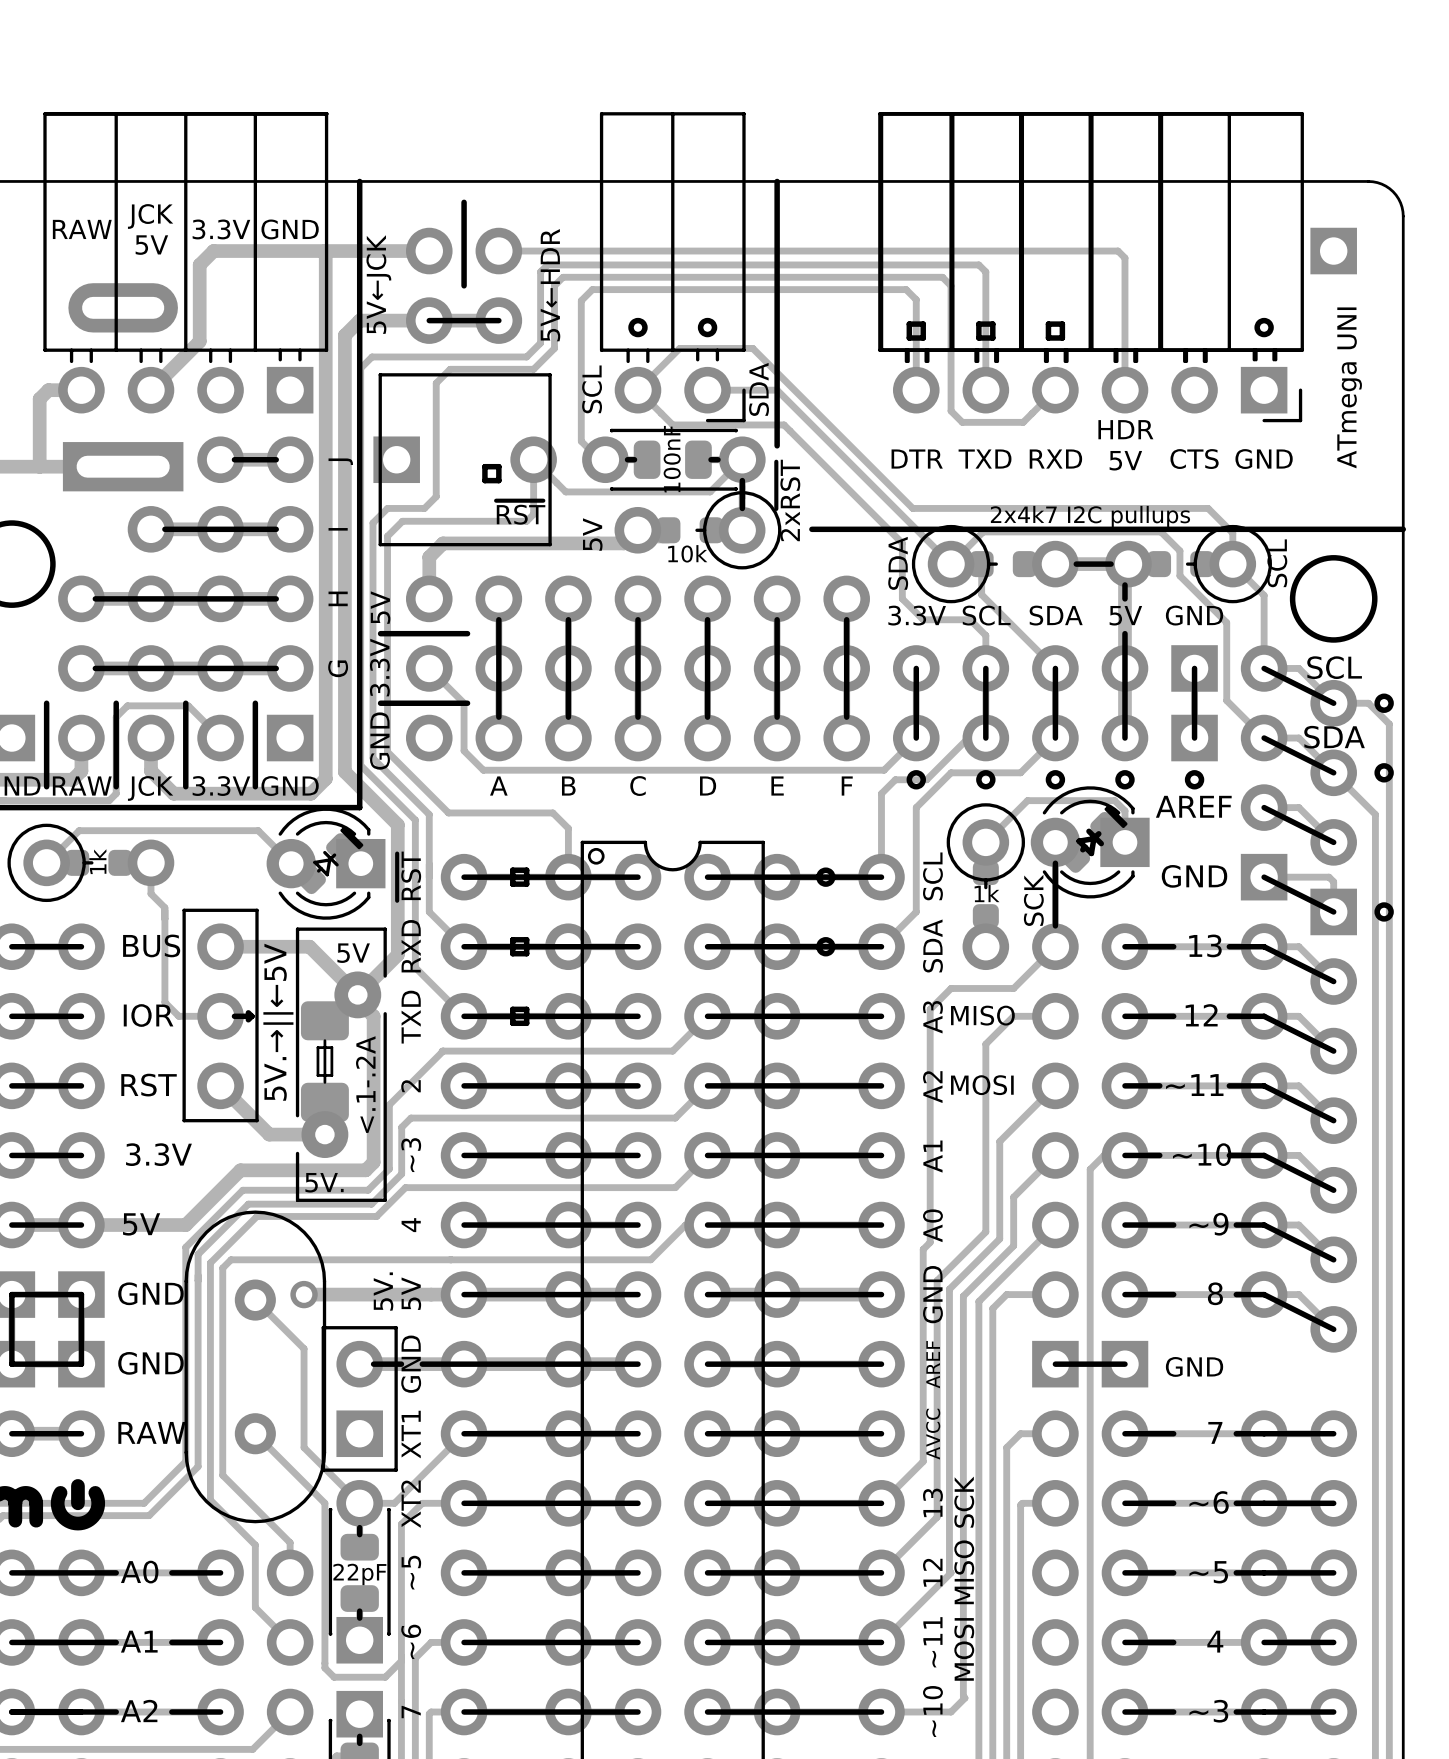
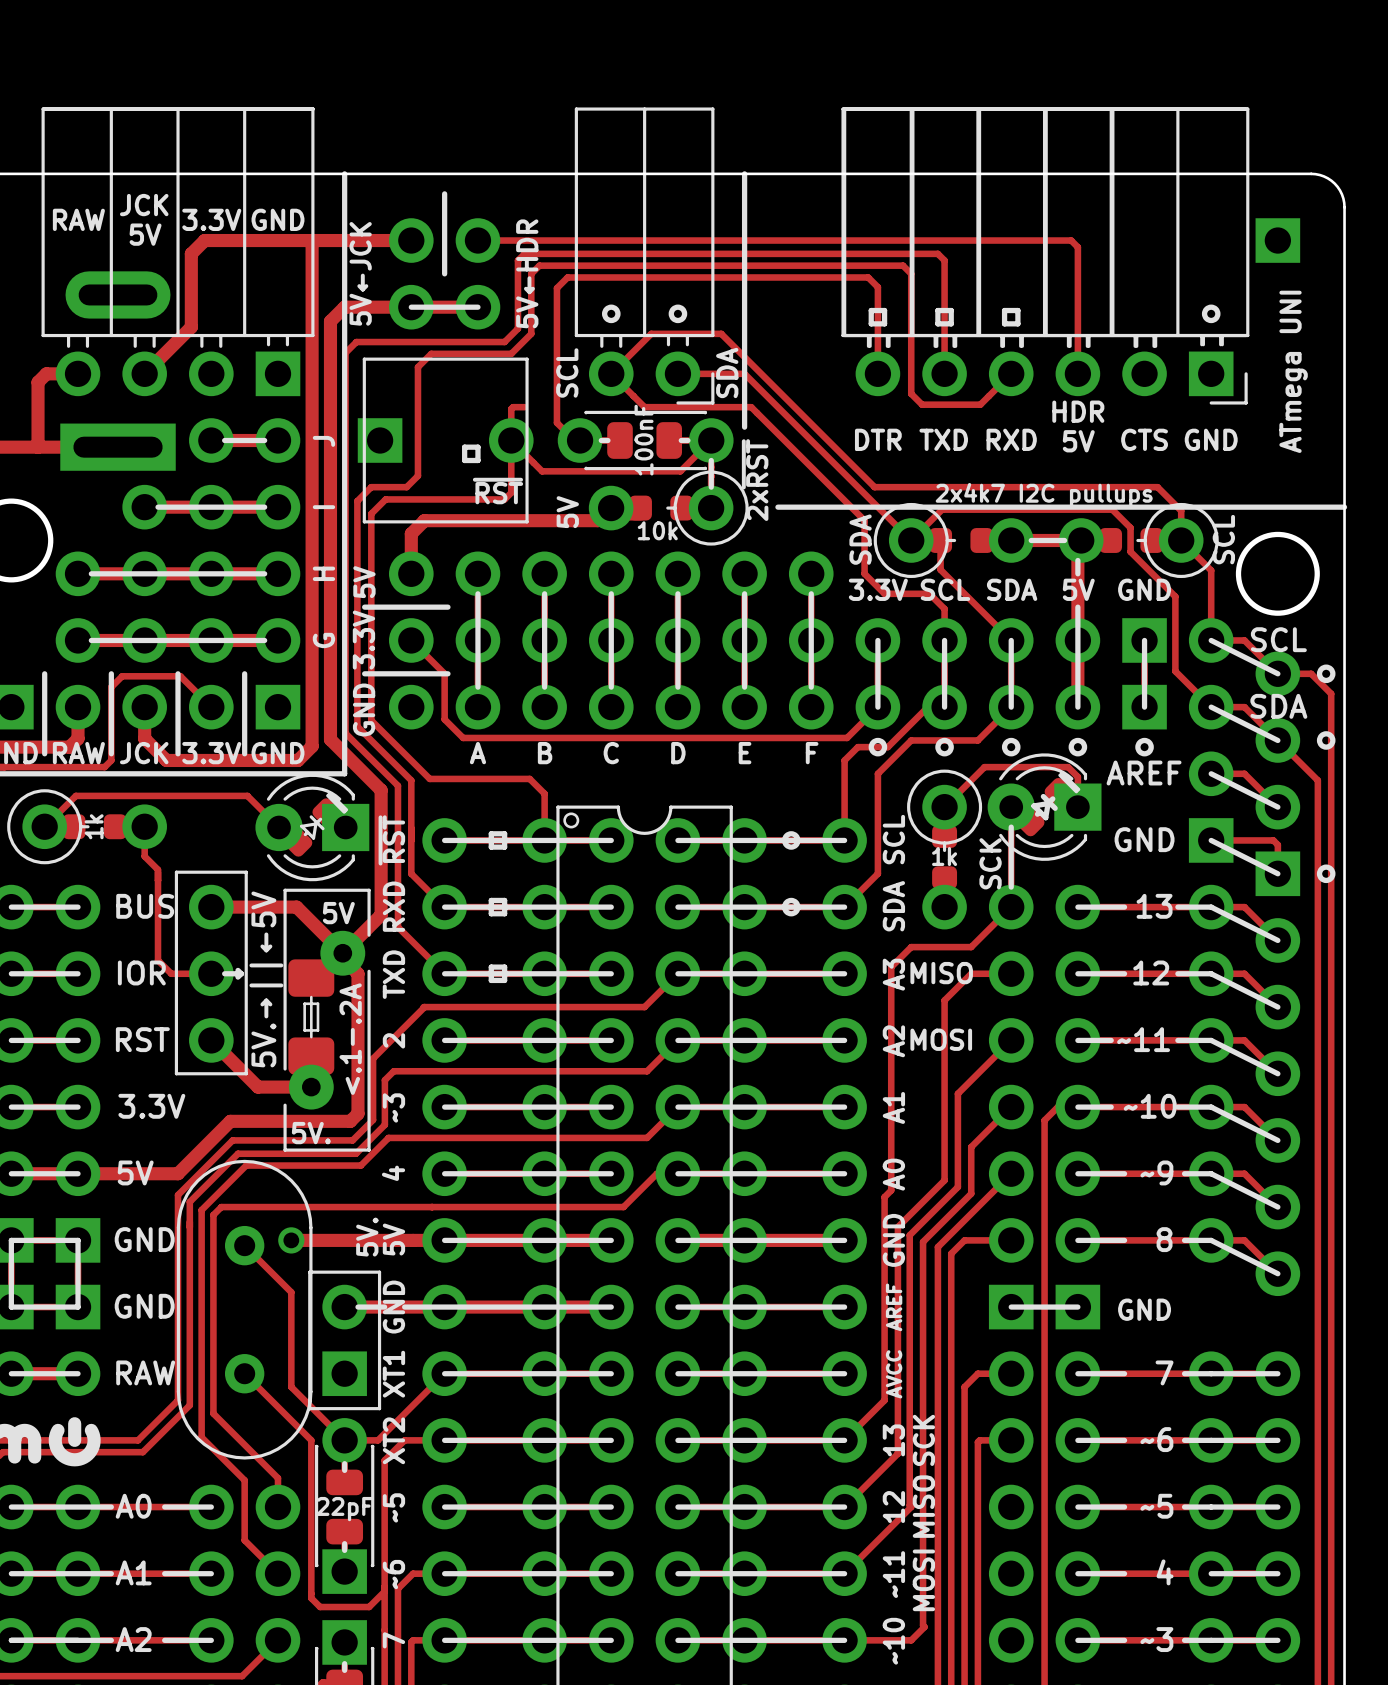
track: none -> (524, 407) (513, 407) (511, 408) (511, 440)

